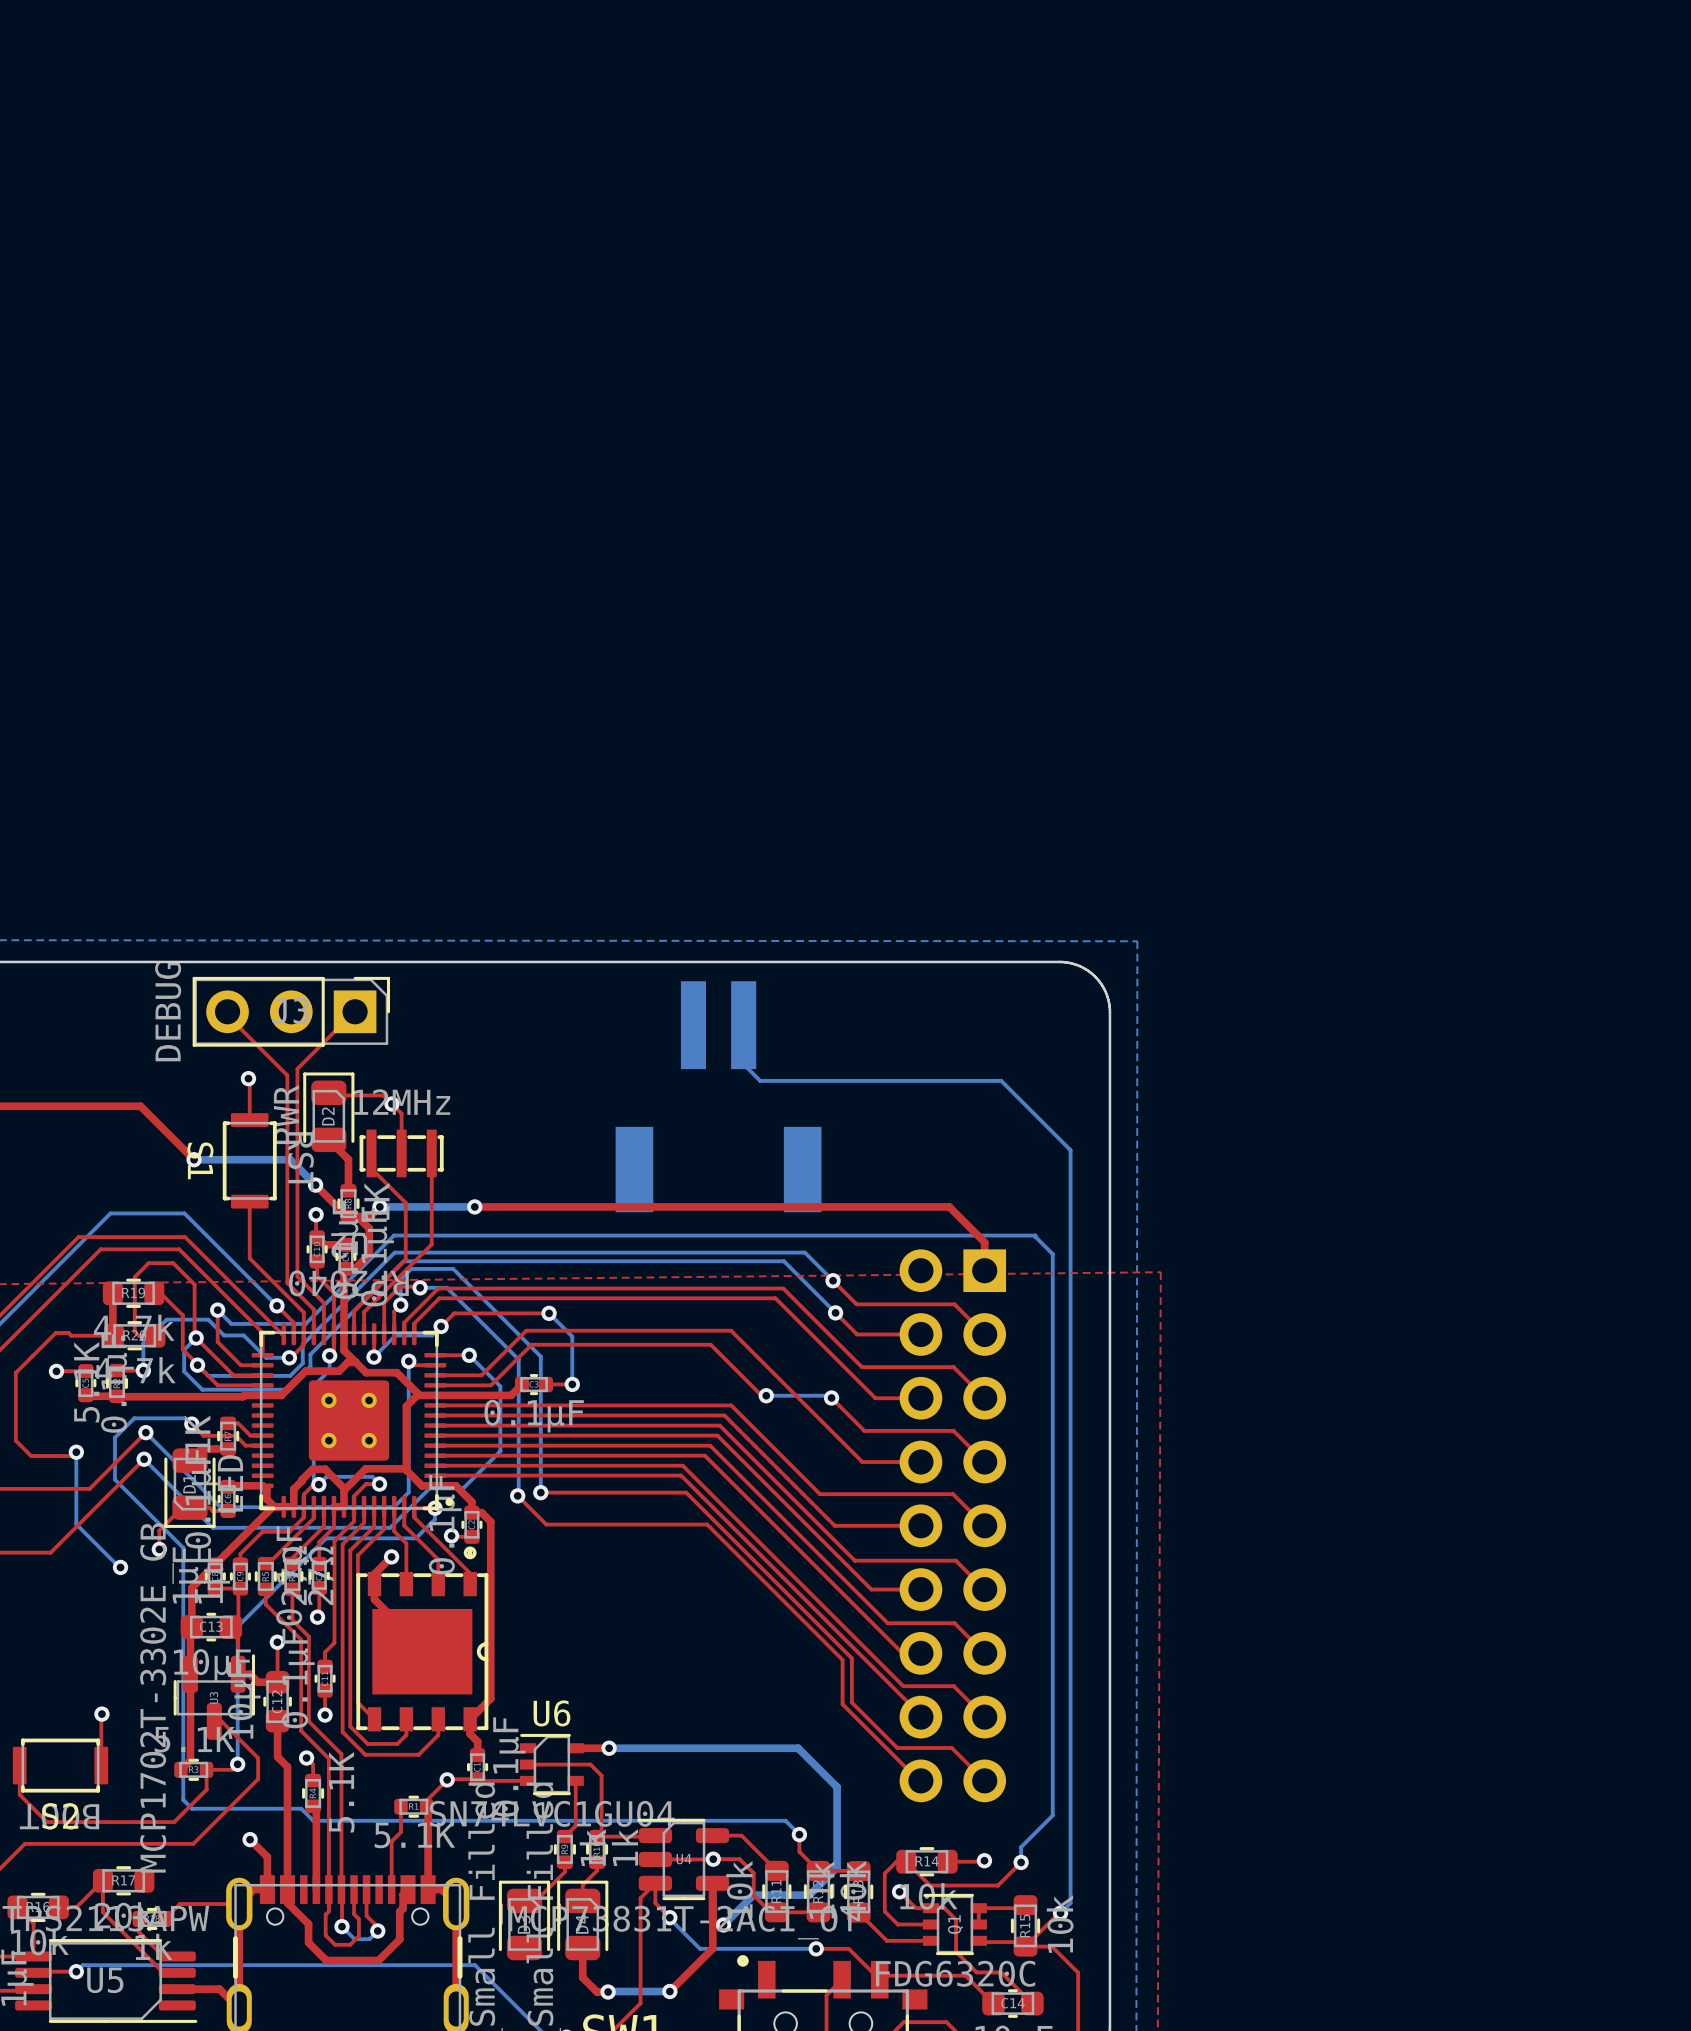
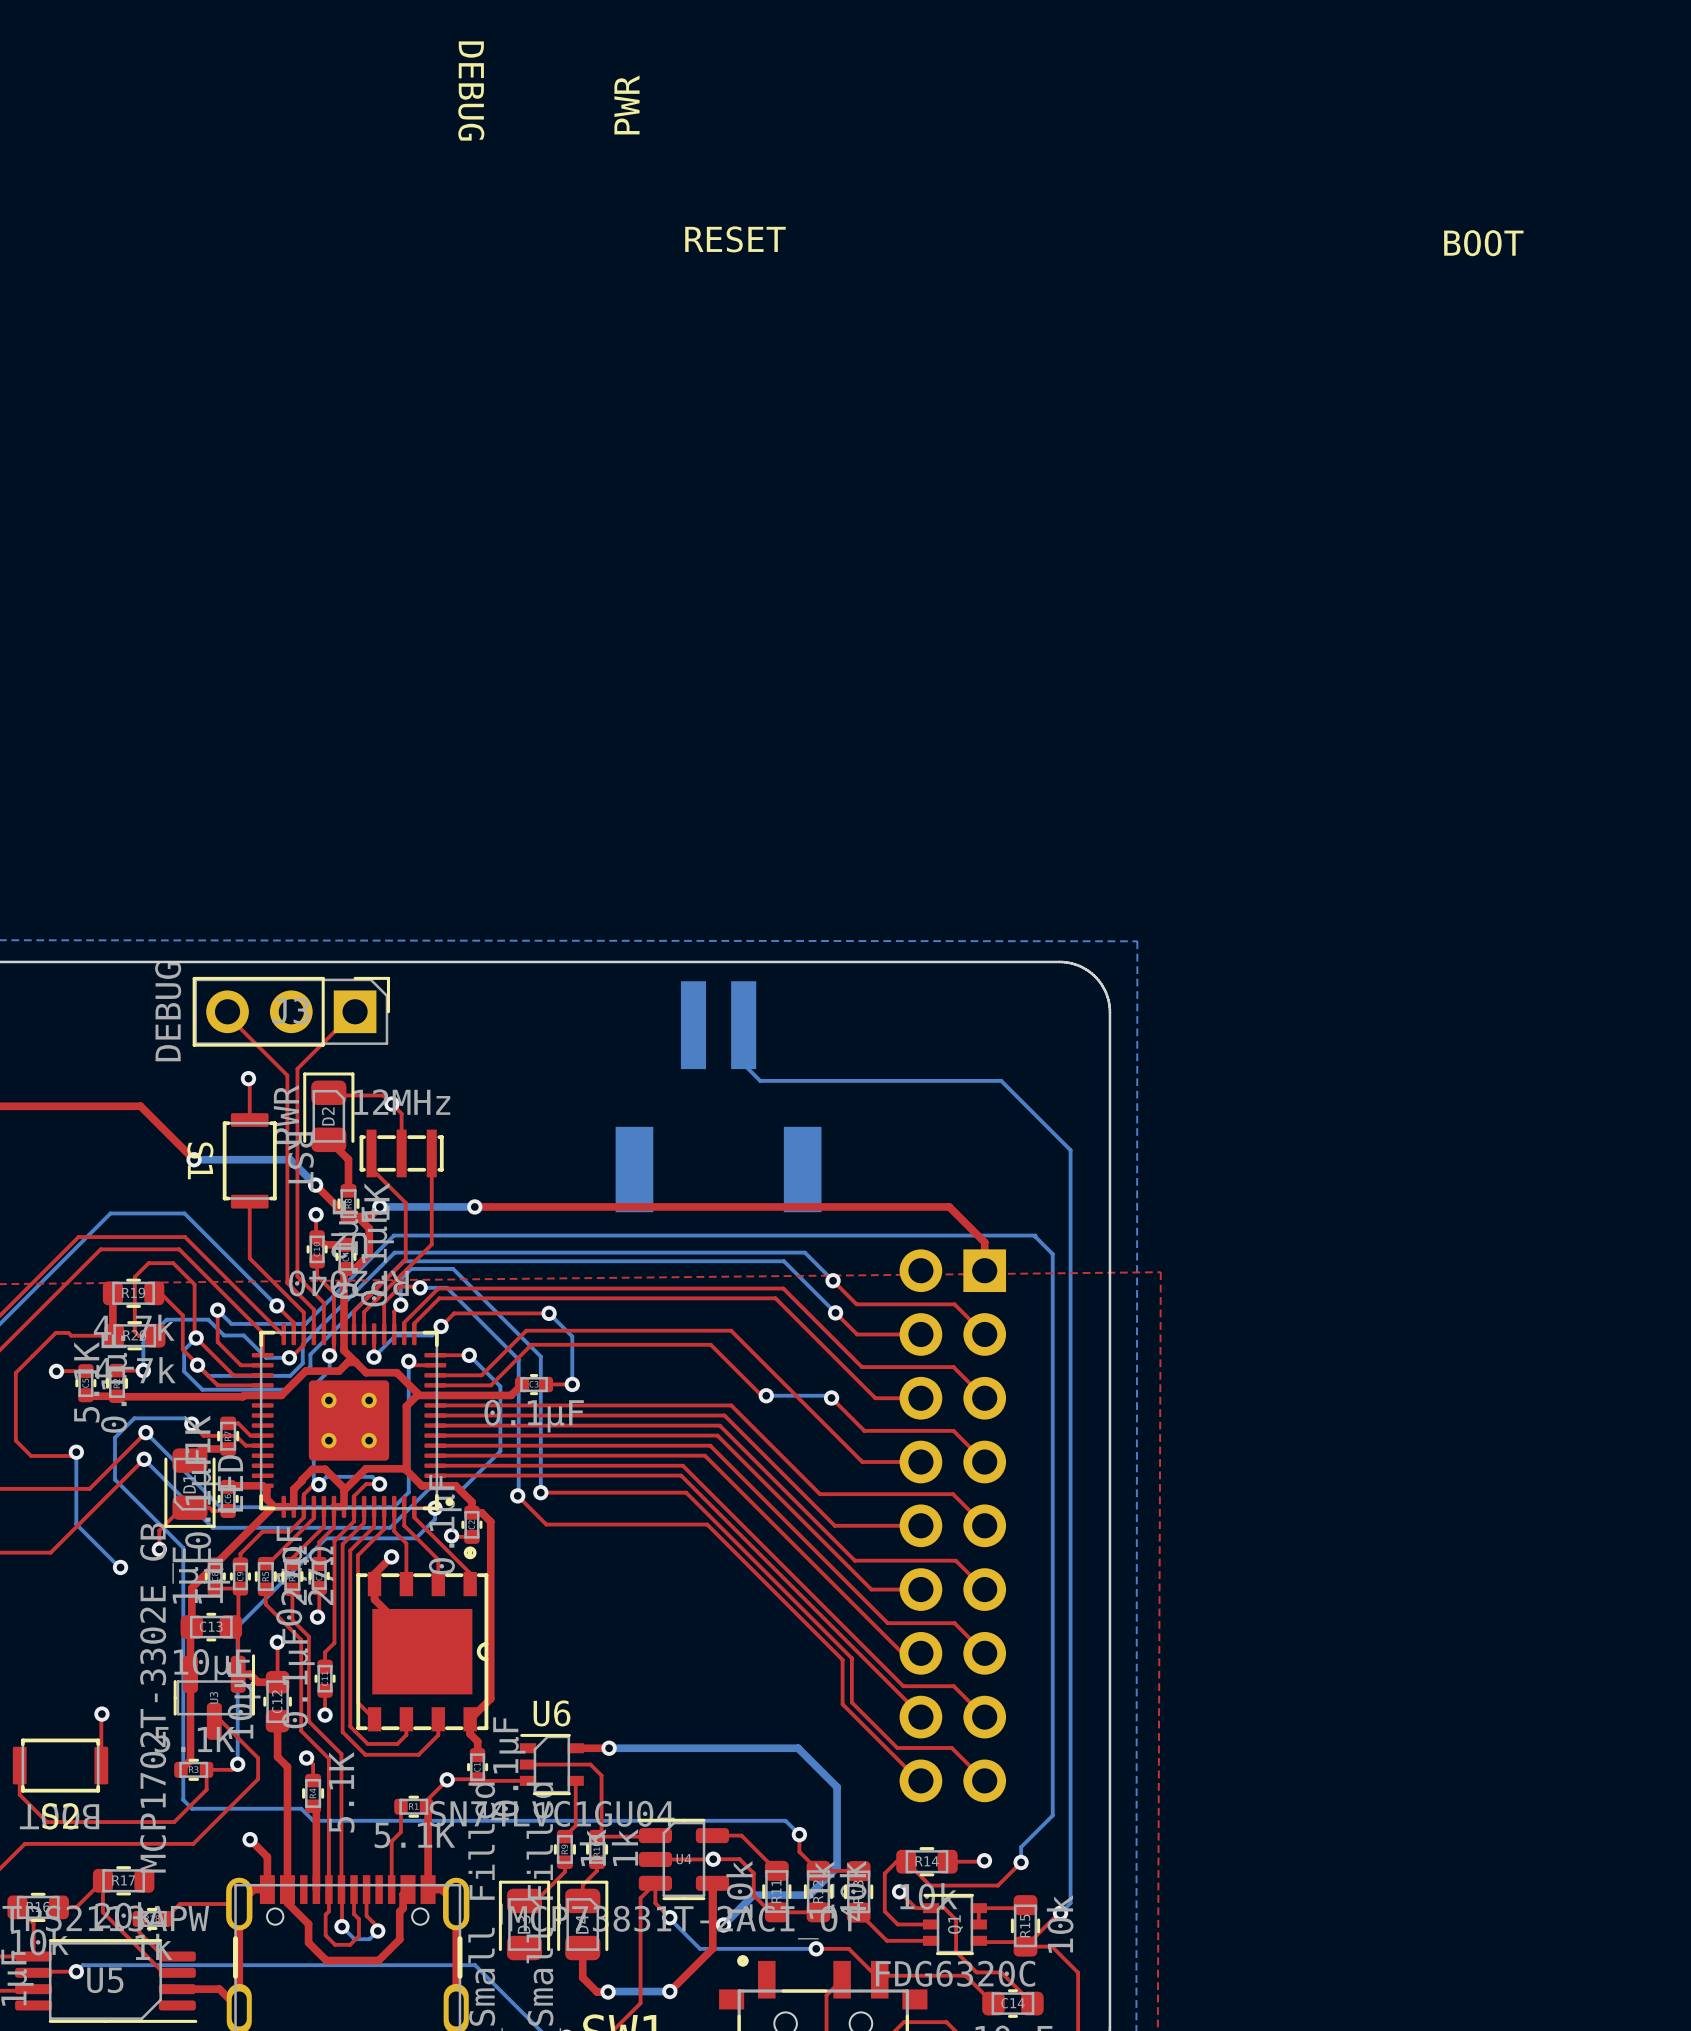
text: none -> DEBUG (471, 91)
text: none -> PWR (627, 104)
text: none -> RESET (735, 239)
text: none -> BOOT (1483, 243)

